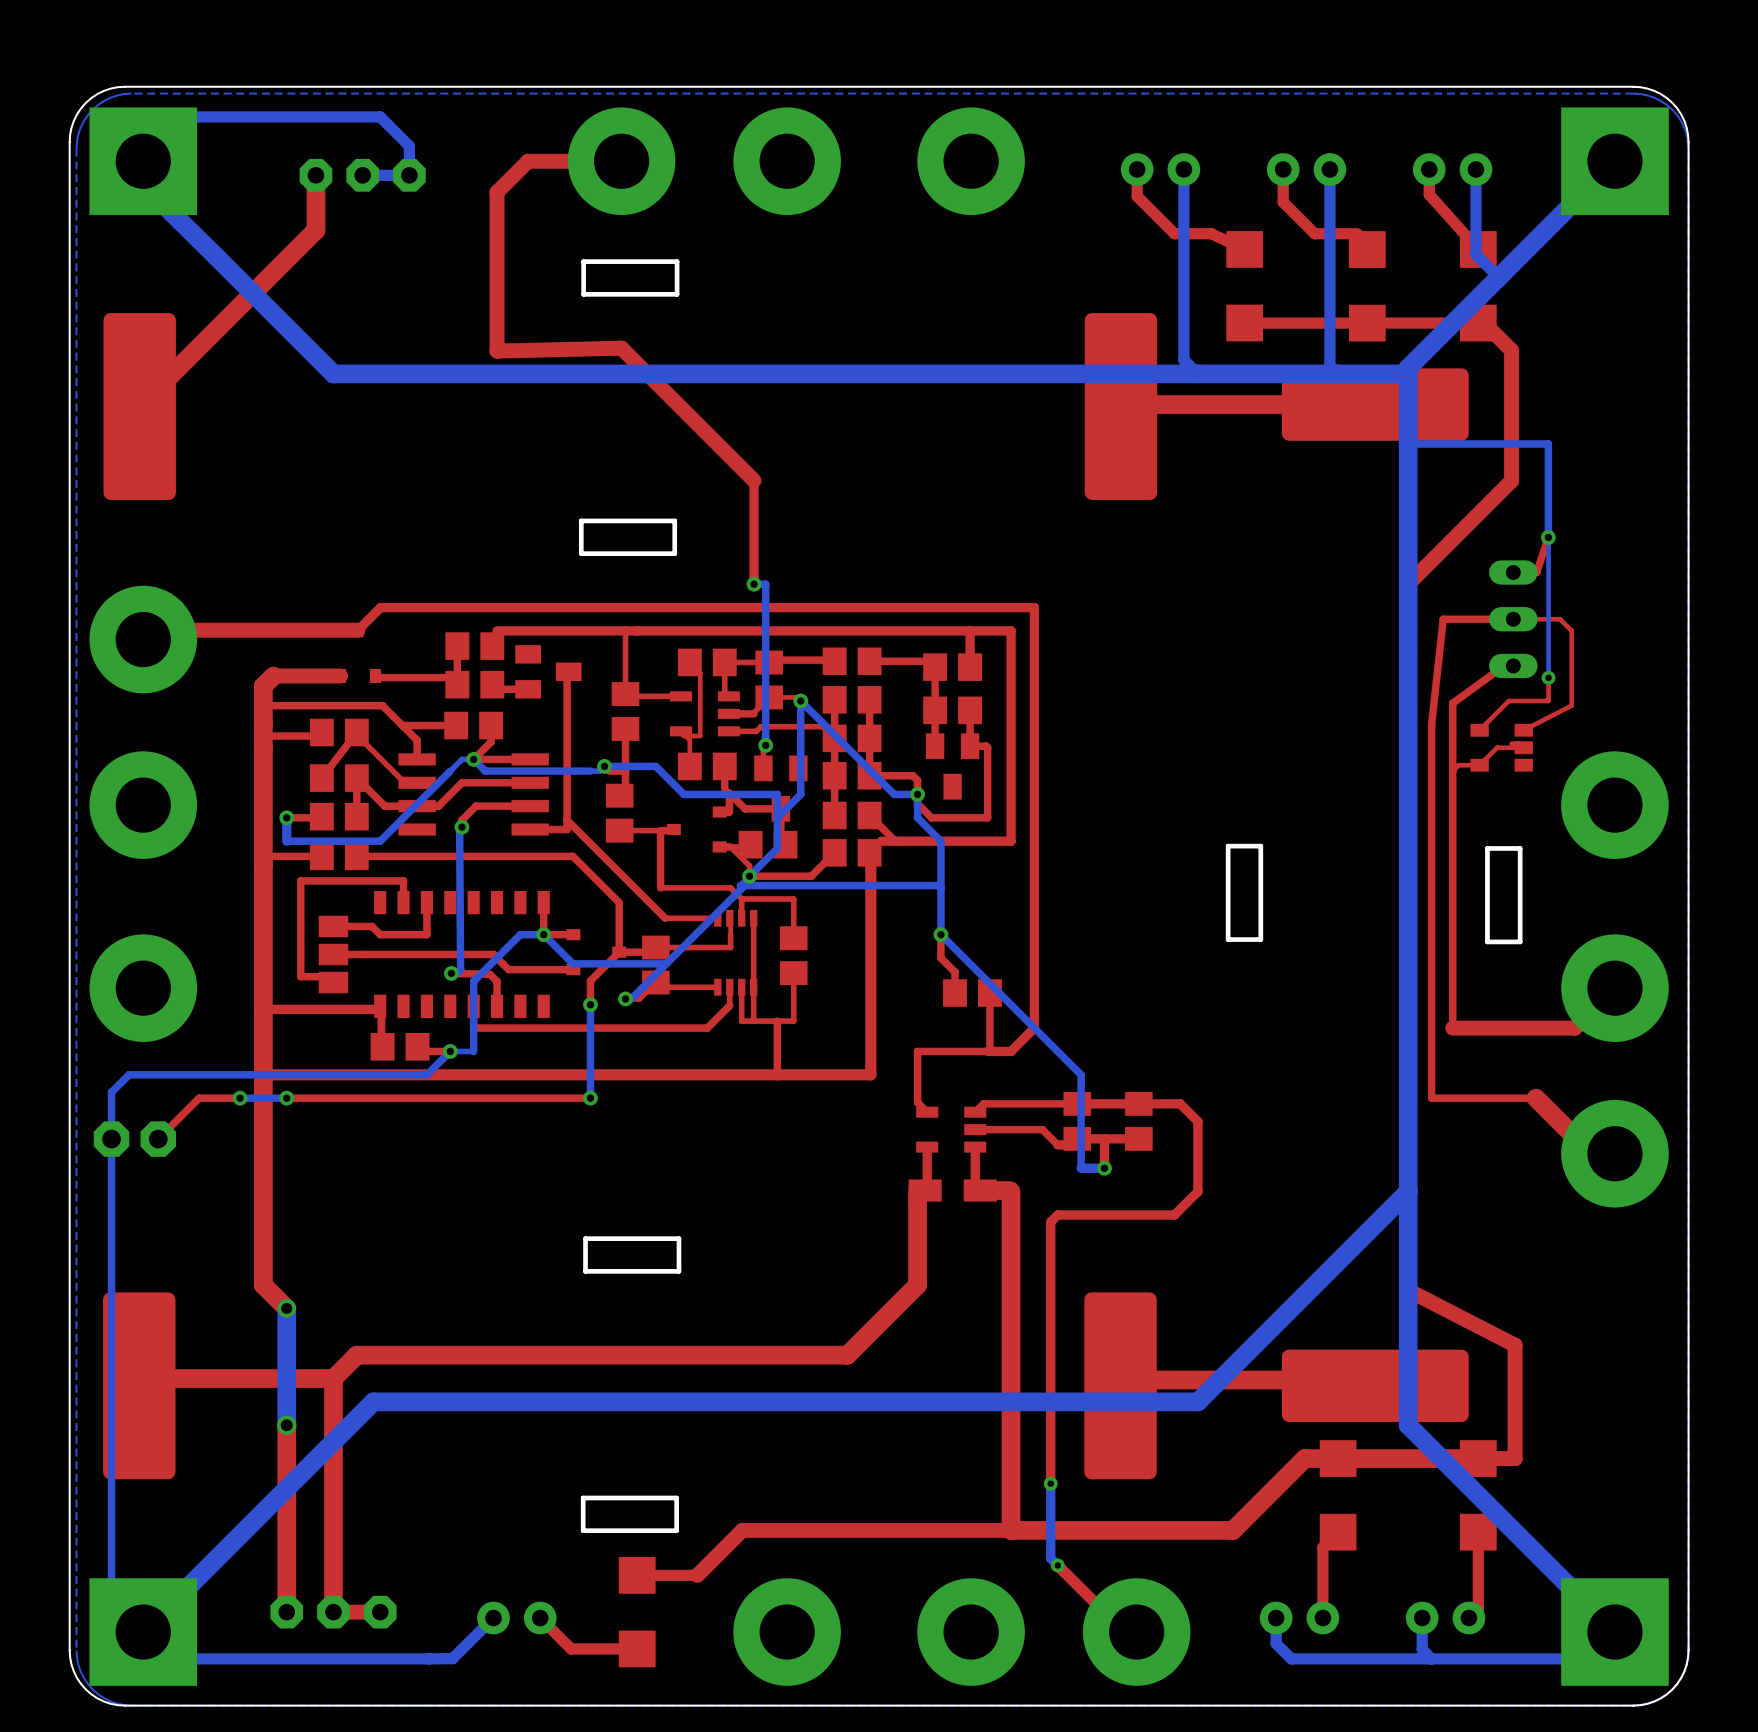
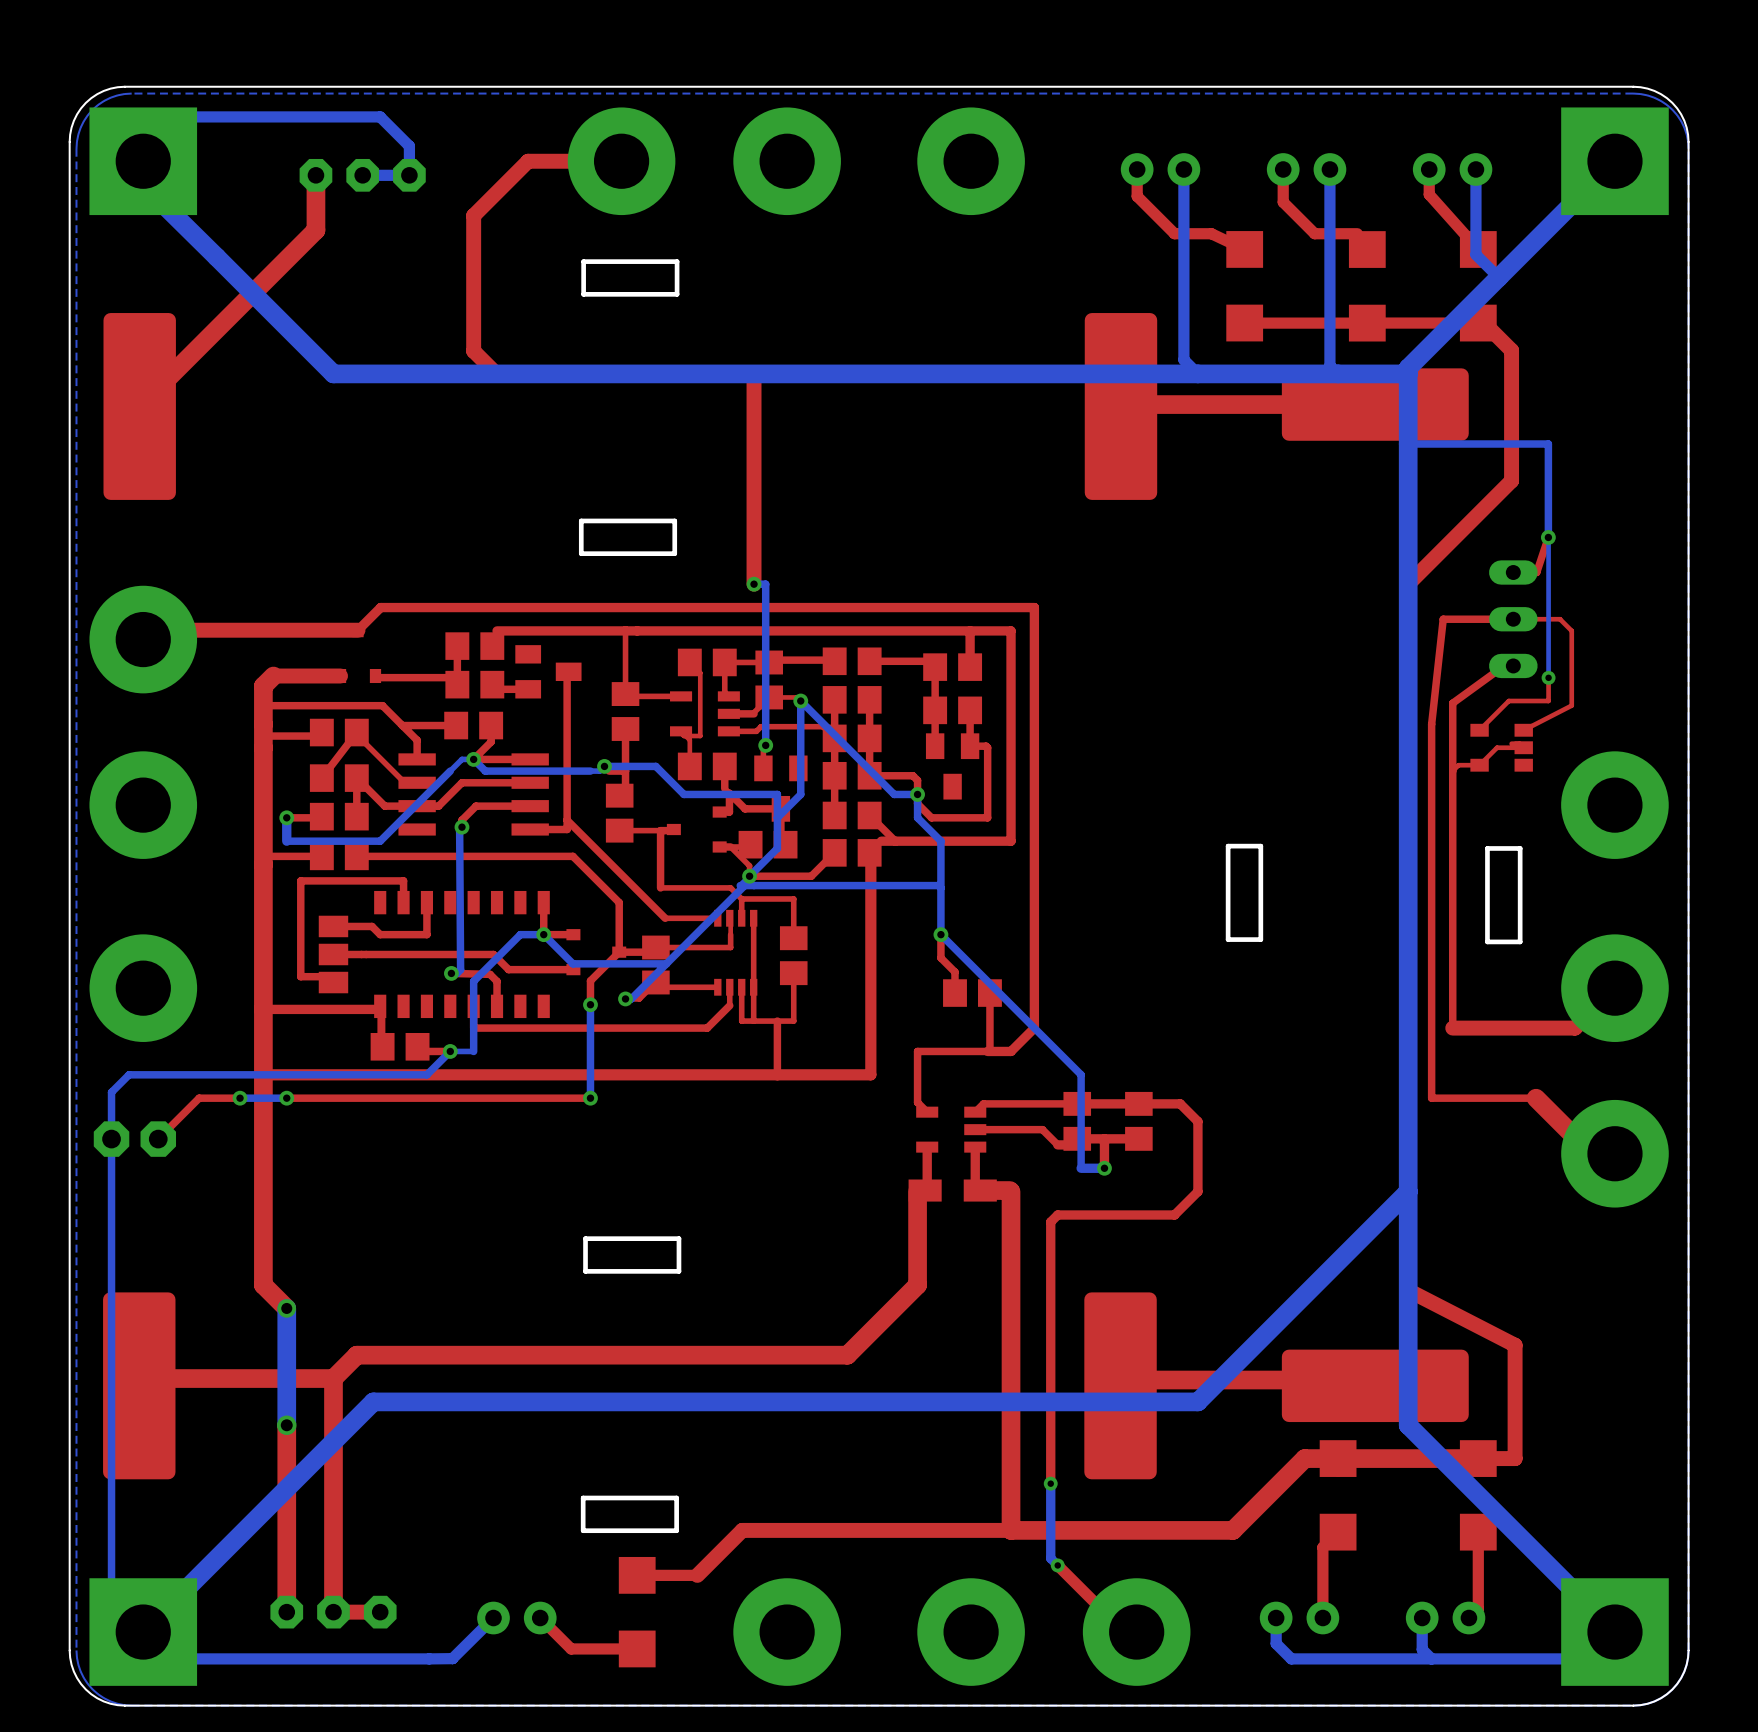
top track: (497, 192) (497, 351) (621, 348) (754, 480) -> (497, 192) (473, 215) (473, 351) (496, 373) (754, 373) (754, 480)
top track width: thin (754, 480) (754, 584) -> thick (754, 480) (754, 584)

